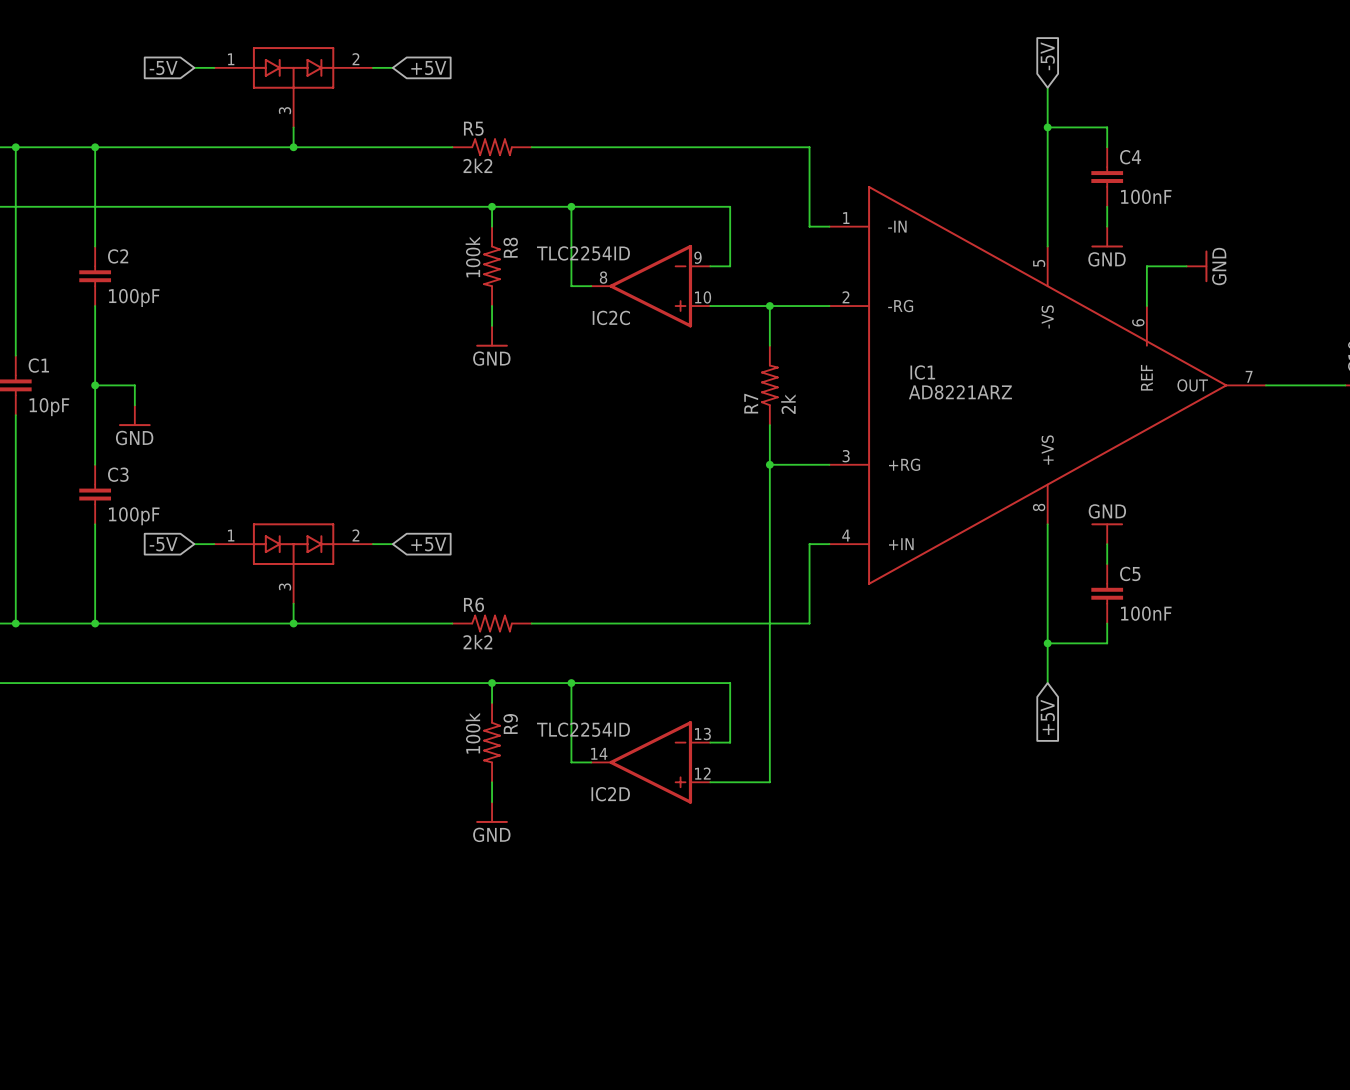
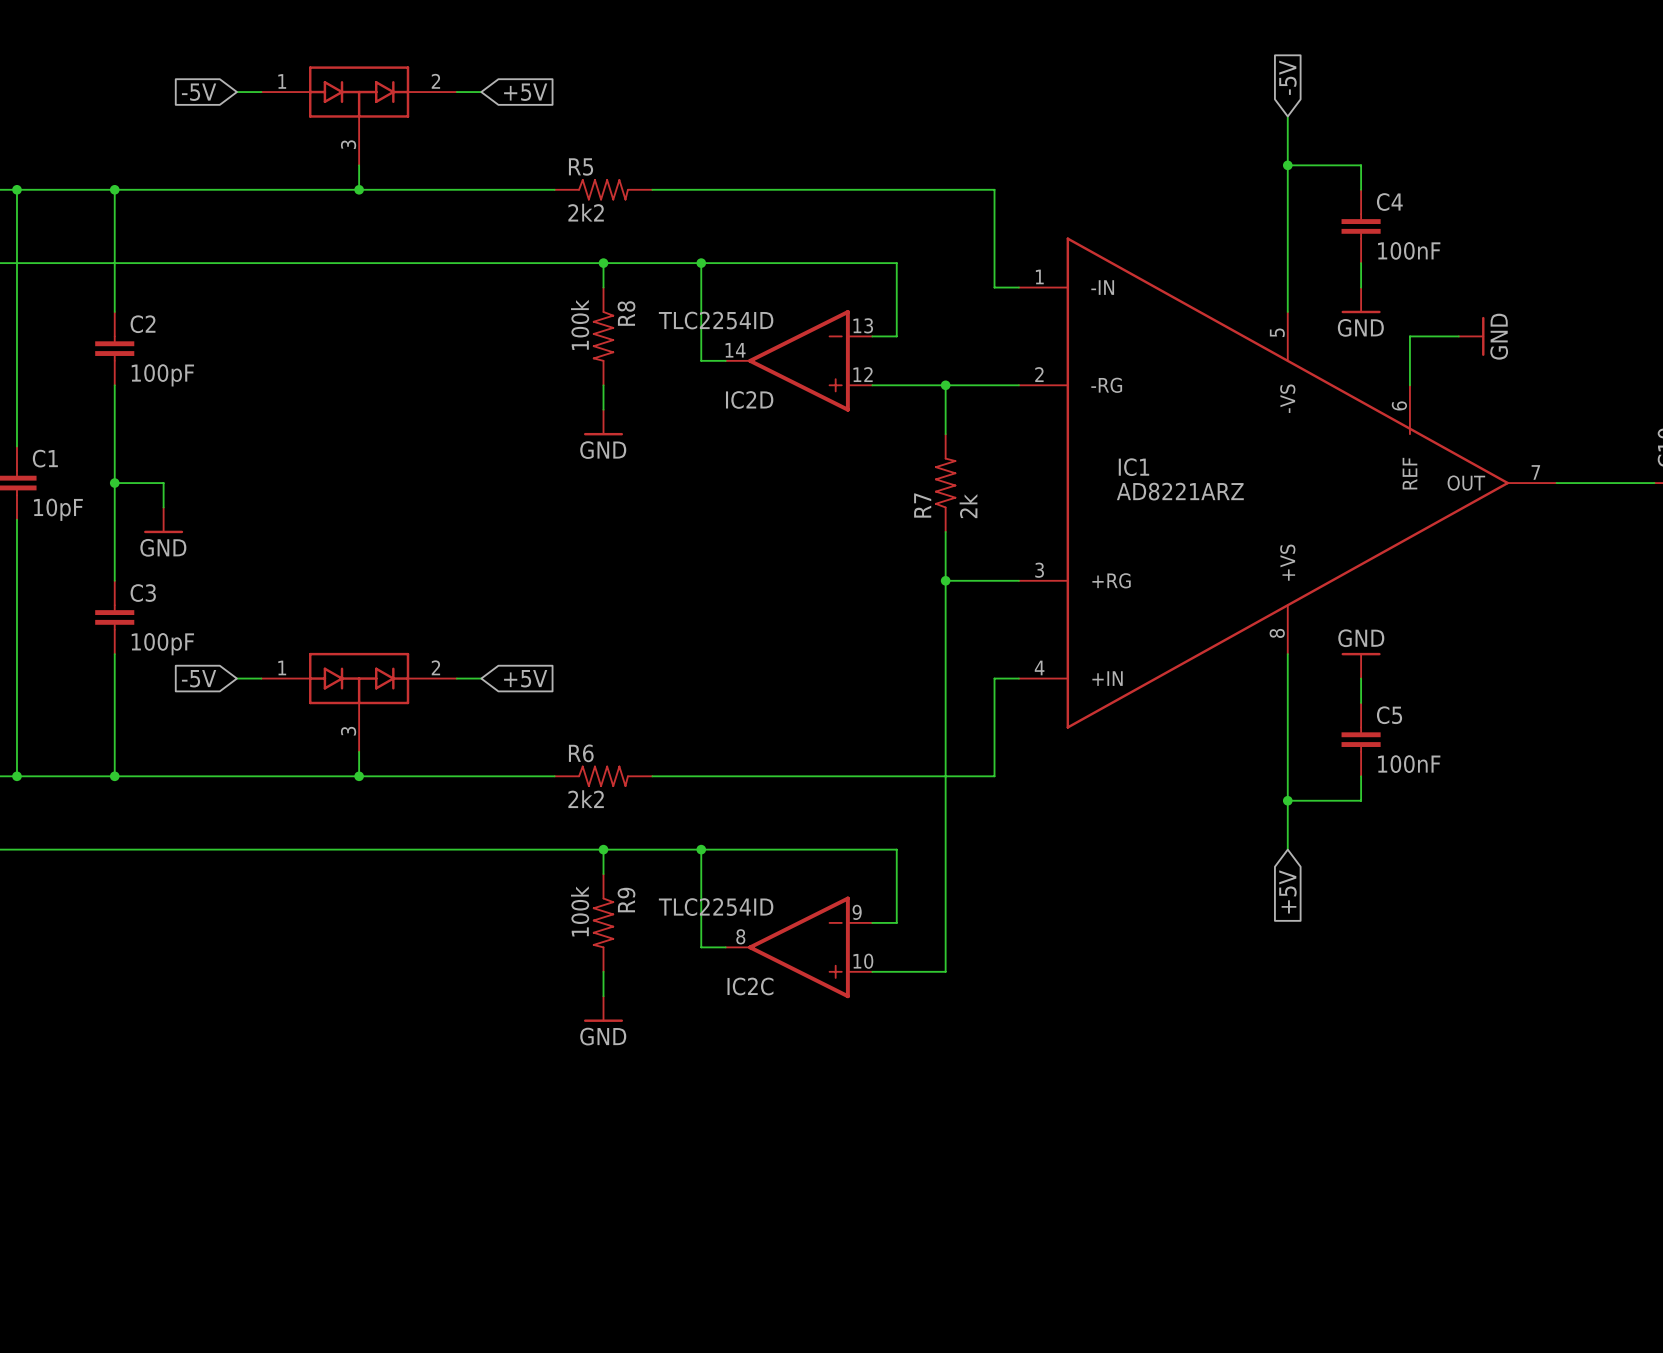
IC2C position: (650, 286) -> (799, 947)
IC2D position: (650, 762) -> (799, 360)

